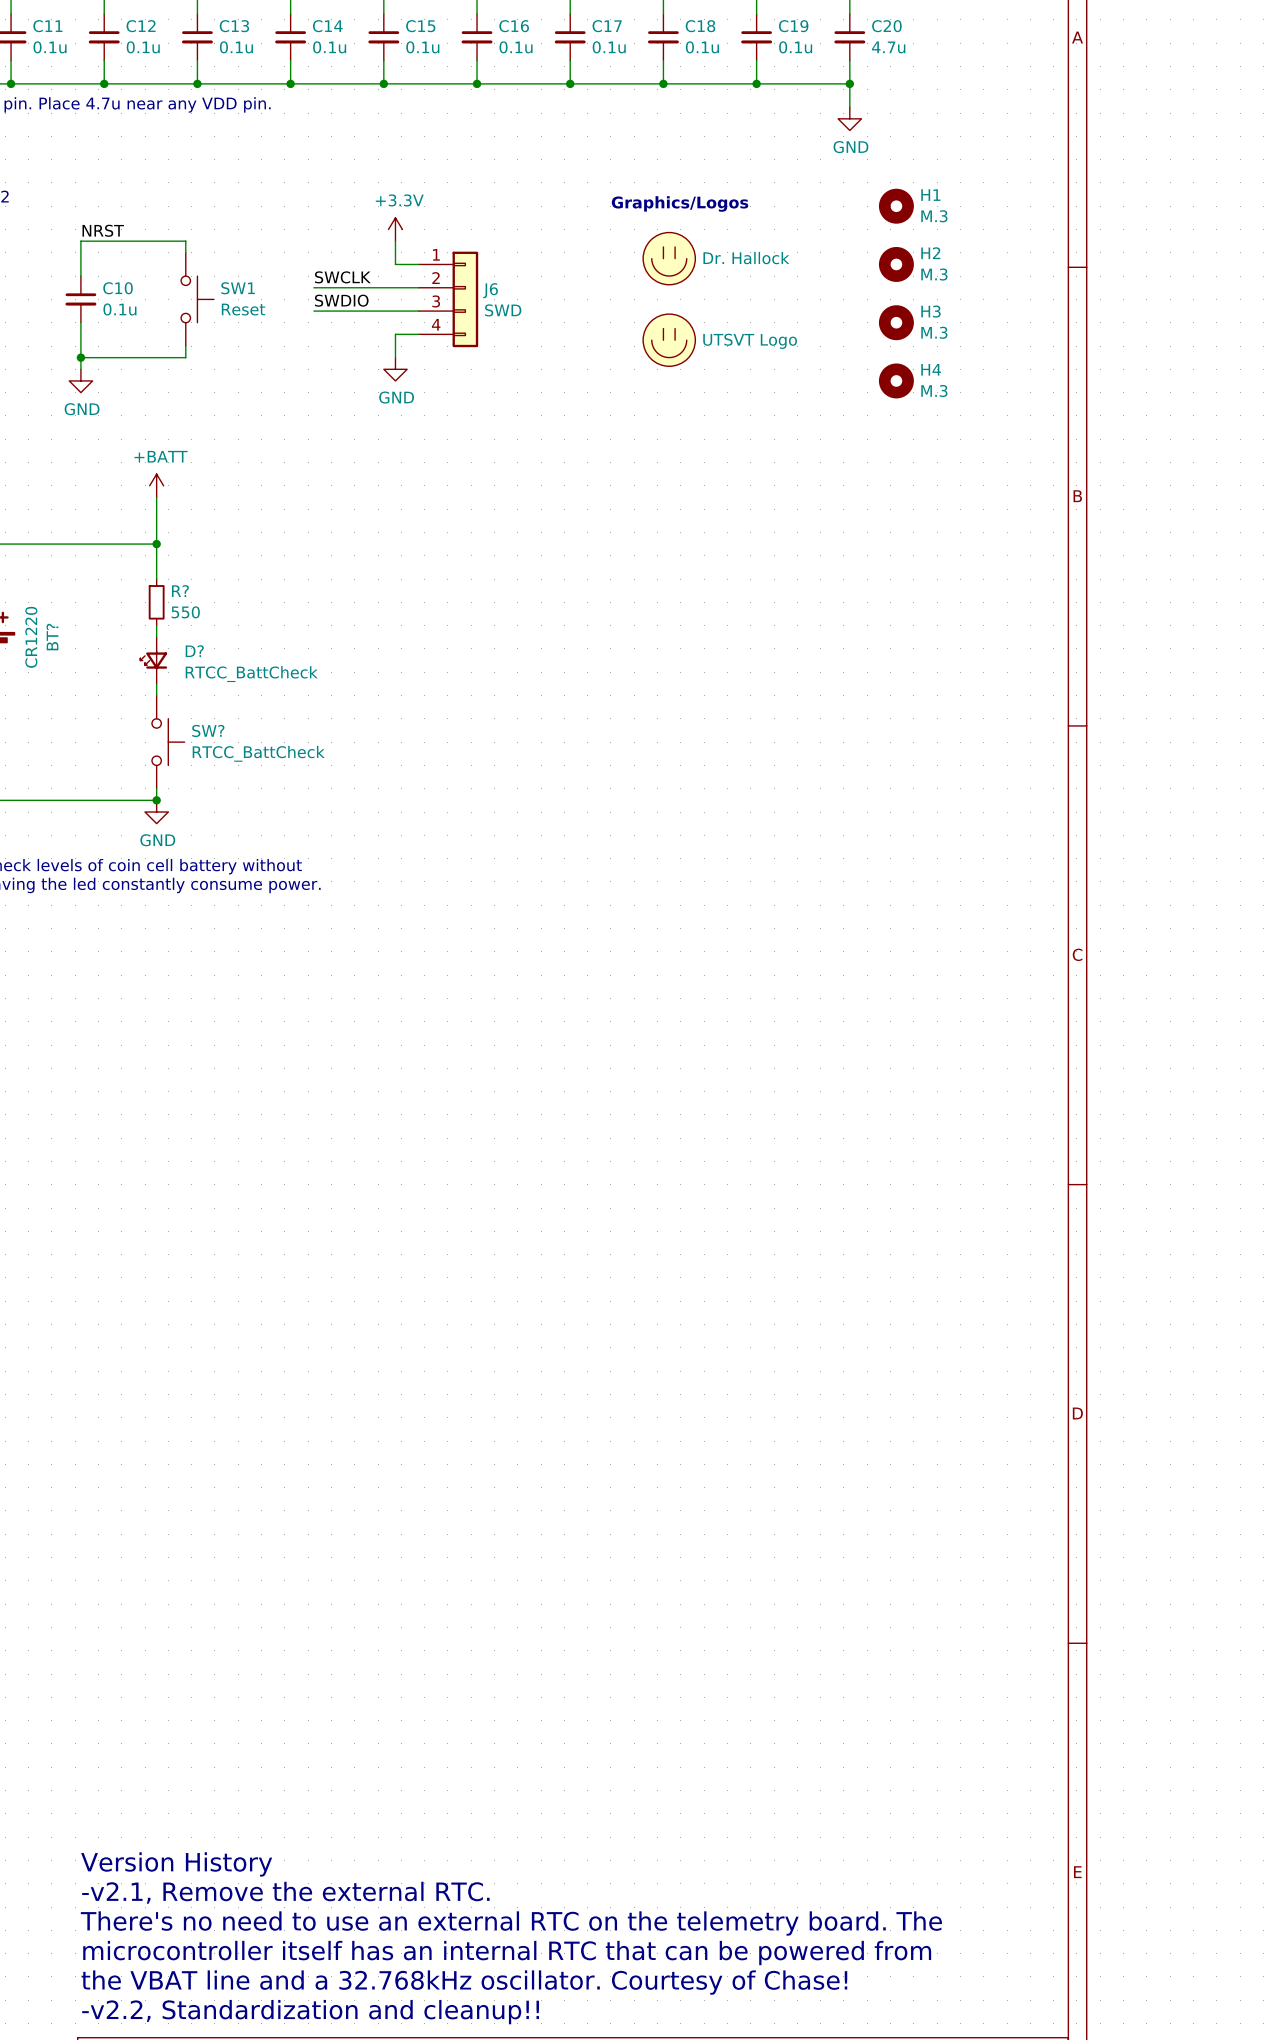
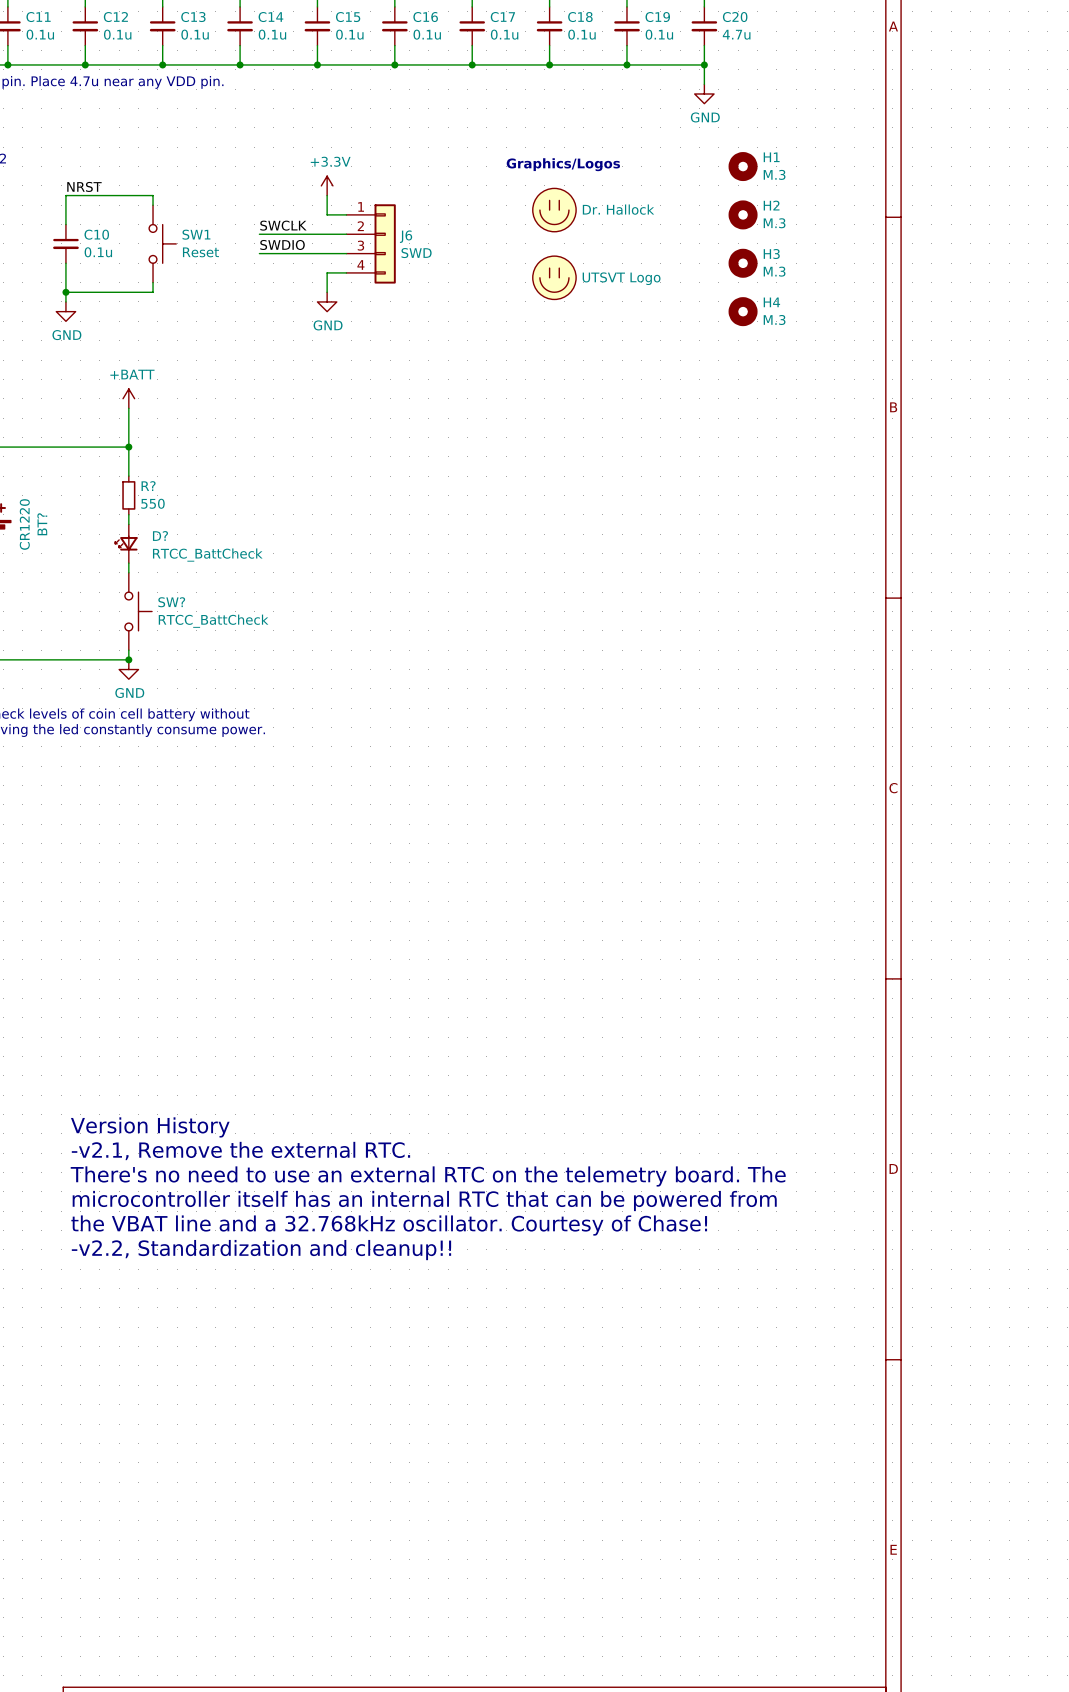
text: none -> Version History (150, 1127)
text: none -> -v2.1, Remove the external RTC. (240, 1150)
text: none -> There's no need to use an external RTC on the telemetry board. The (428, 1176)
text: none -> microcontroller itself has an internal RTC that can be powered from (424, 1201)
text: none -> the VBAT line and a 32.768kHz oscillator. Courtesy of Chase! (389, 1225)
text: none -> -v2.2, Standardization and cleanup!! (261, 1250)
text: Version History (176, 1864) -> none
text: -v2.1, Remove the external RTC. (285, 1892) -> none
text: There's no need to use an external RTC on the telemetry board. The (511, 1923) -> none
text: microcontroller itself has an internal RTC that can be powered from (507, 1953) -> none
text: the VBAT line and a 32.768kHz oscillator. Courtesy of Chase! (464, 1982) -> none
text: -v2.2, Standardization and cleanup!! (310, 2012) -> none

